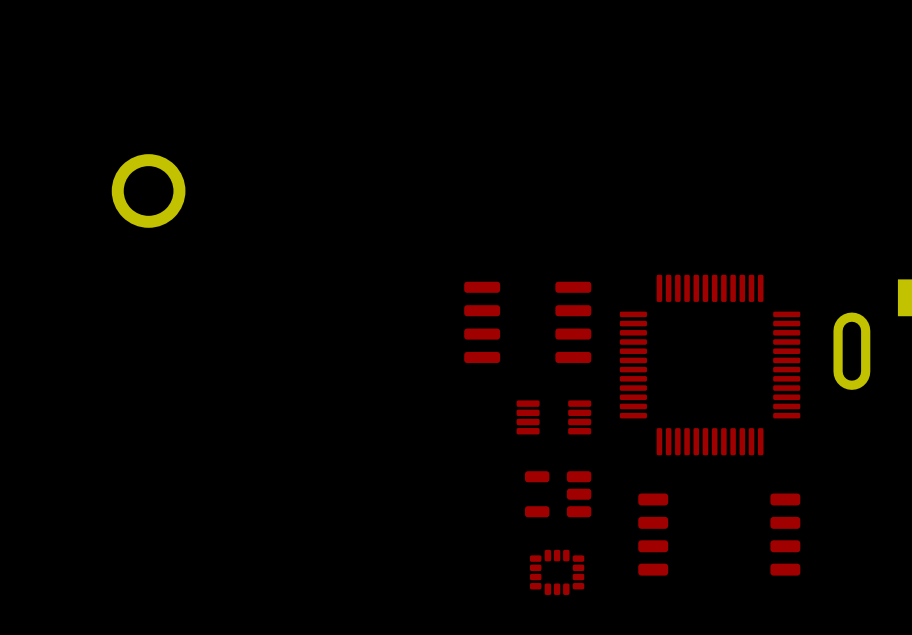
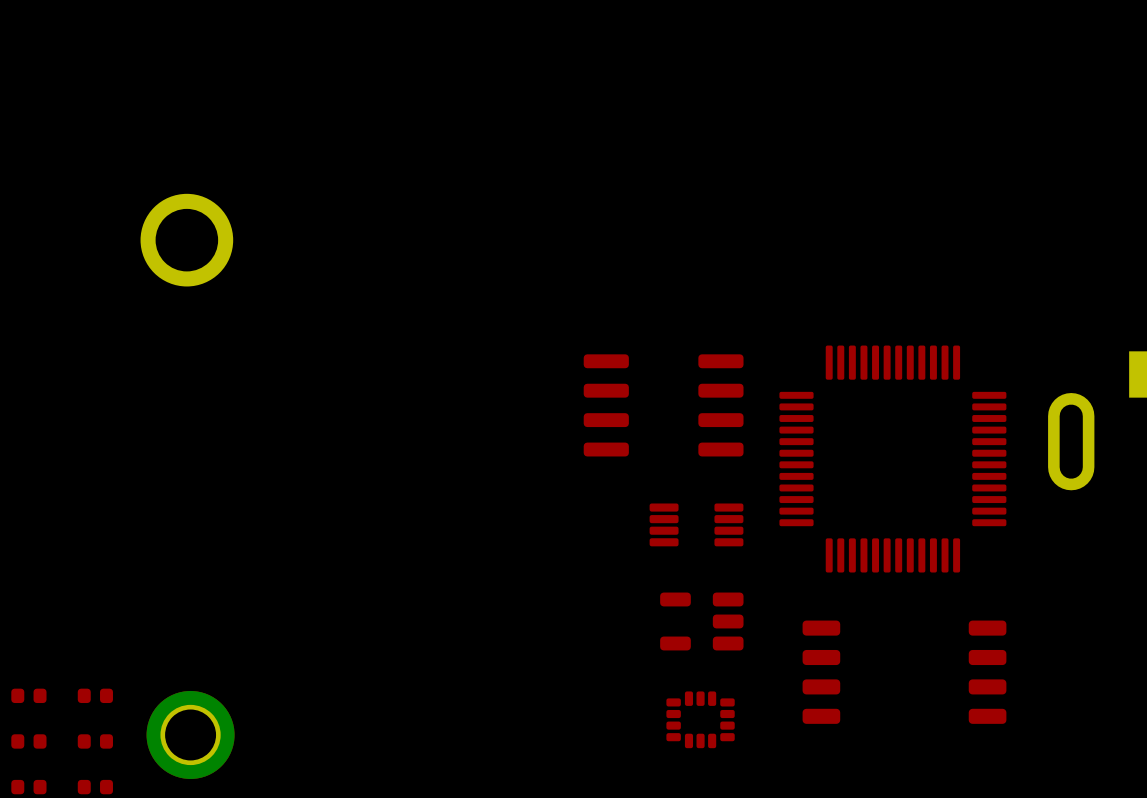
part: none -> (28, 695)
part: none -> (95, 695)
part: none -> (190, 734)
part: none -> (28, 741)
part: none -> (95, 741)
part: none -> (28, 787)
part: none -> (95, 787)

